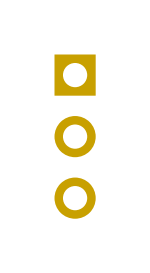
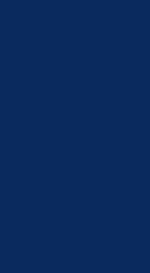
part: (75, 136) -> none

